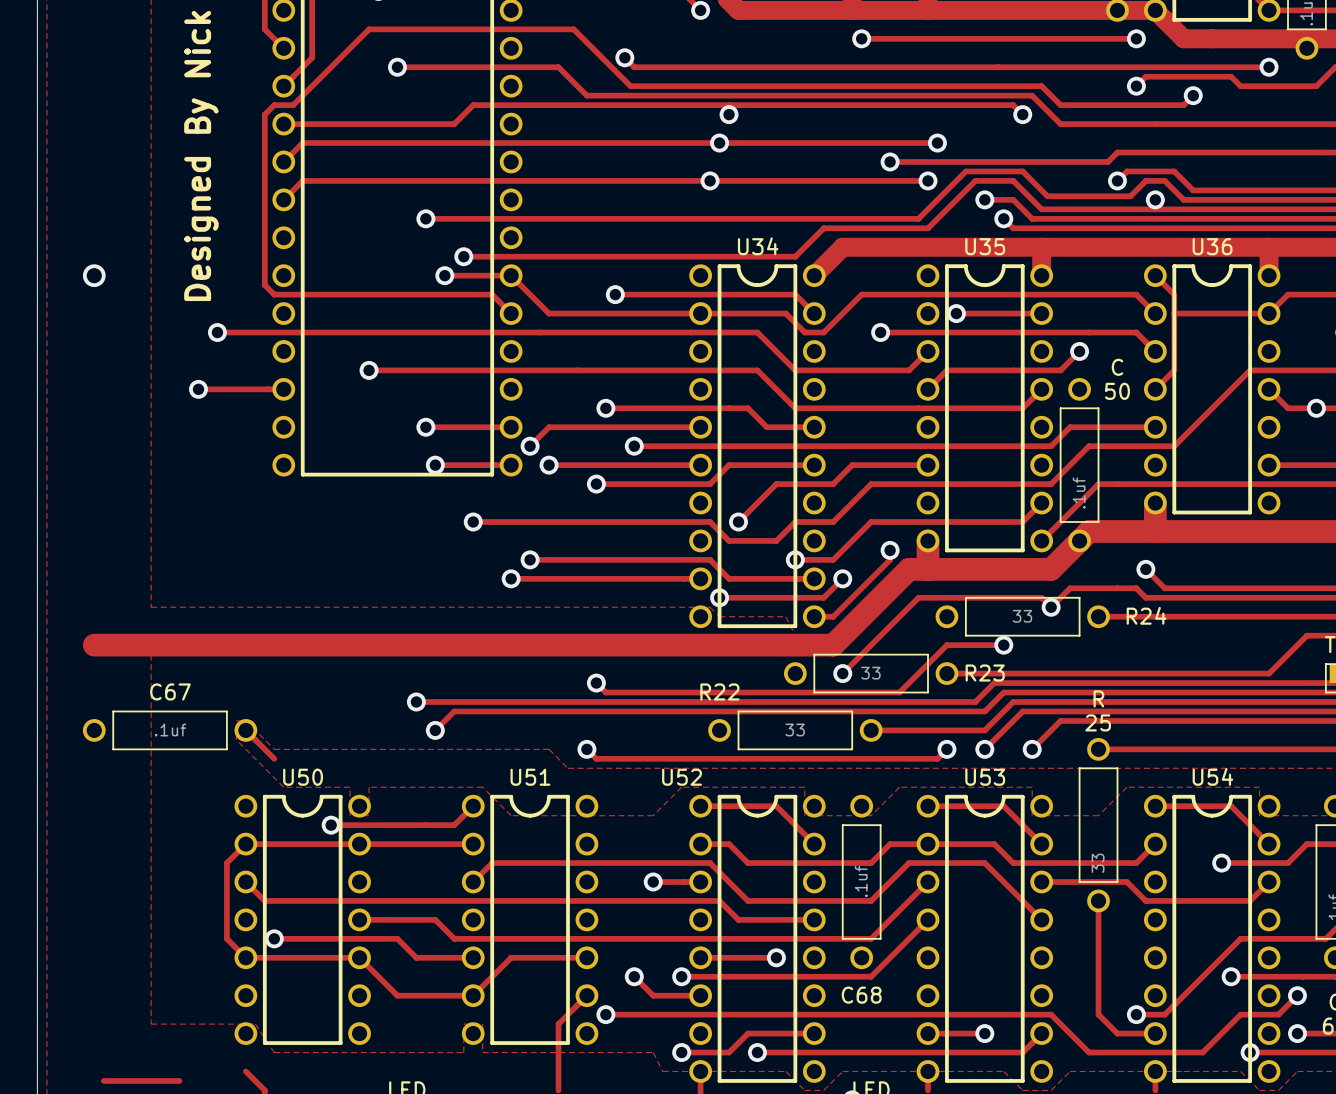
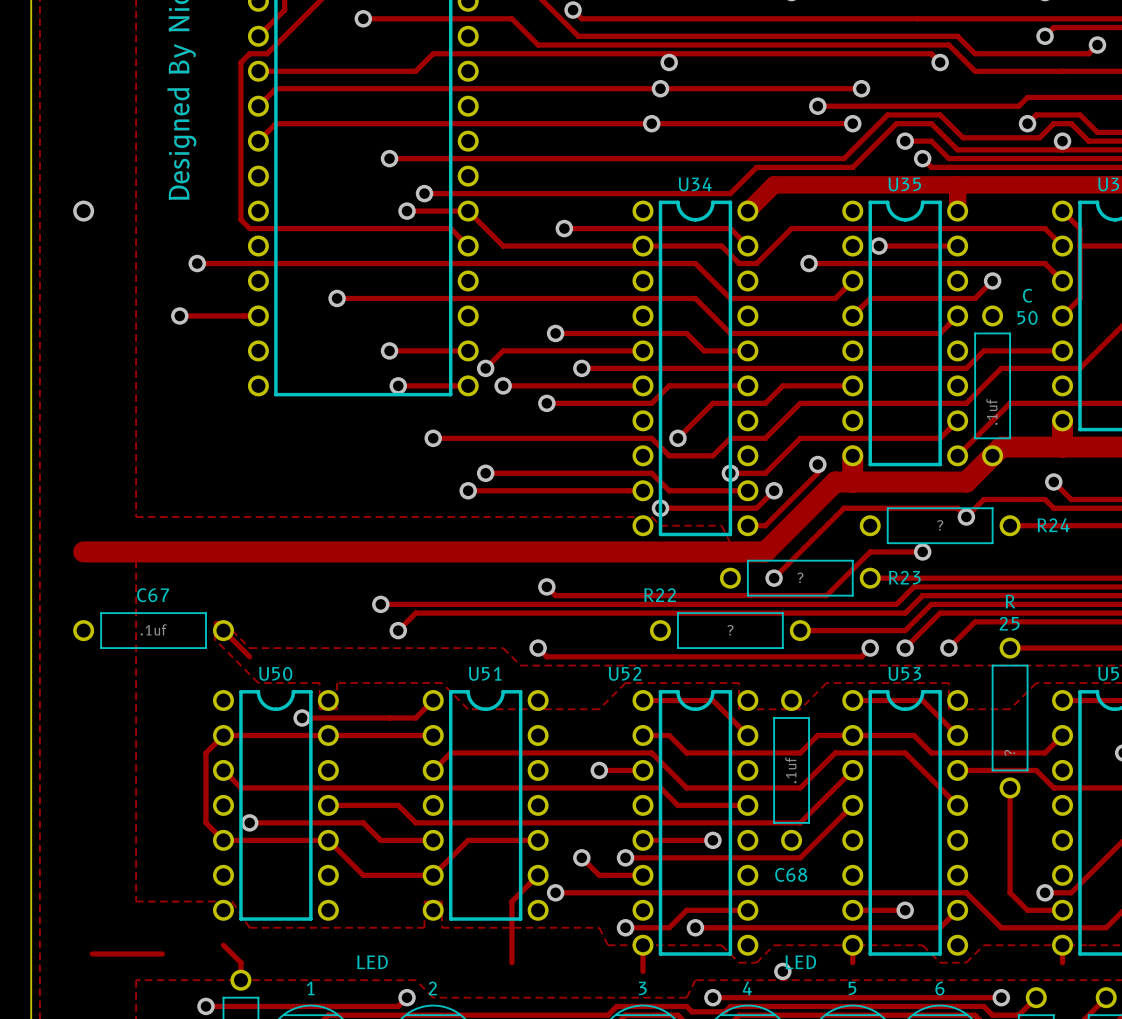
R24 value: 33 (1022, 616) -> ? (940, 525)
R23 value: 33 (870, 673) -> ? (800, 577)
R22 value: 33 (795, 729) -> ? (730, 630)
part value: 33 (1098, 863) -> ? (1009, 752)

